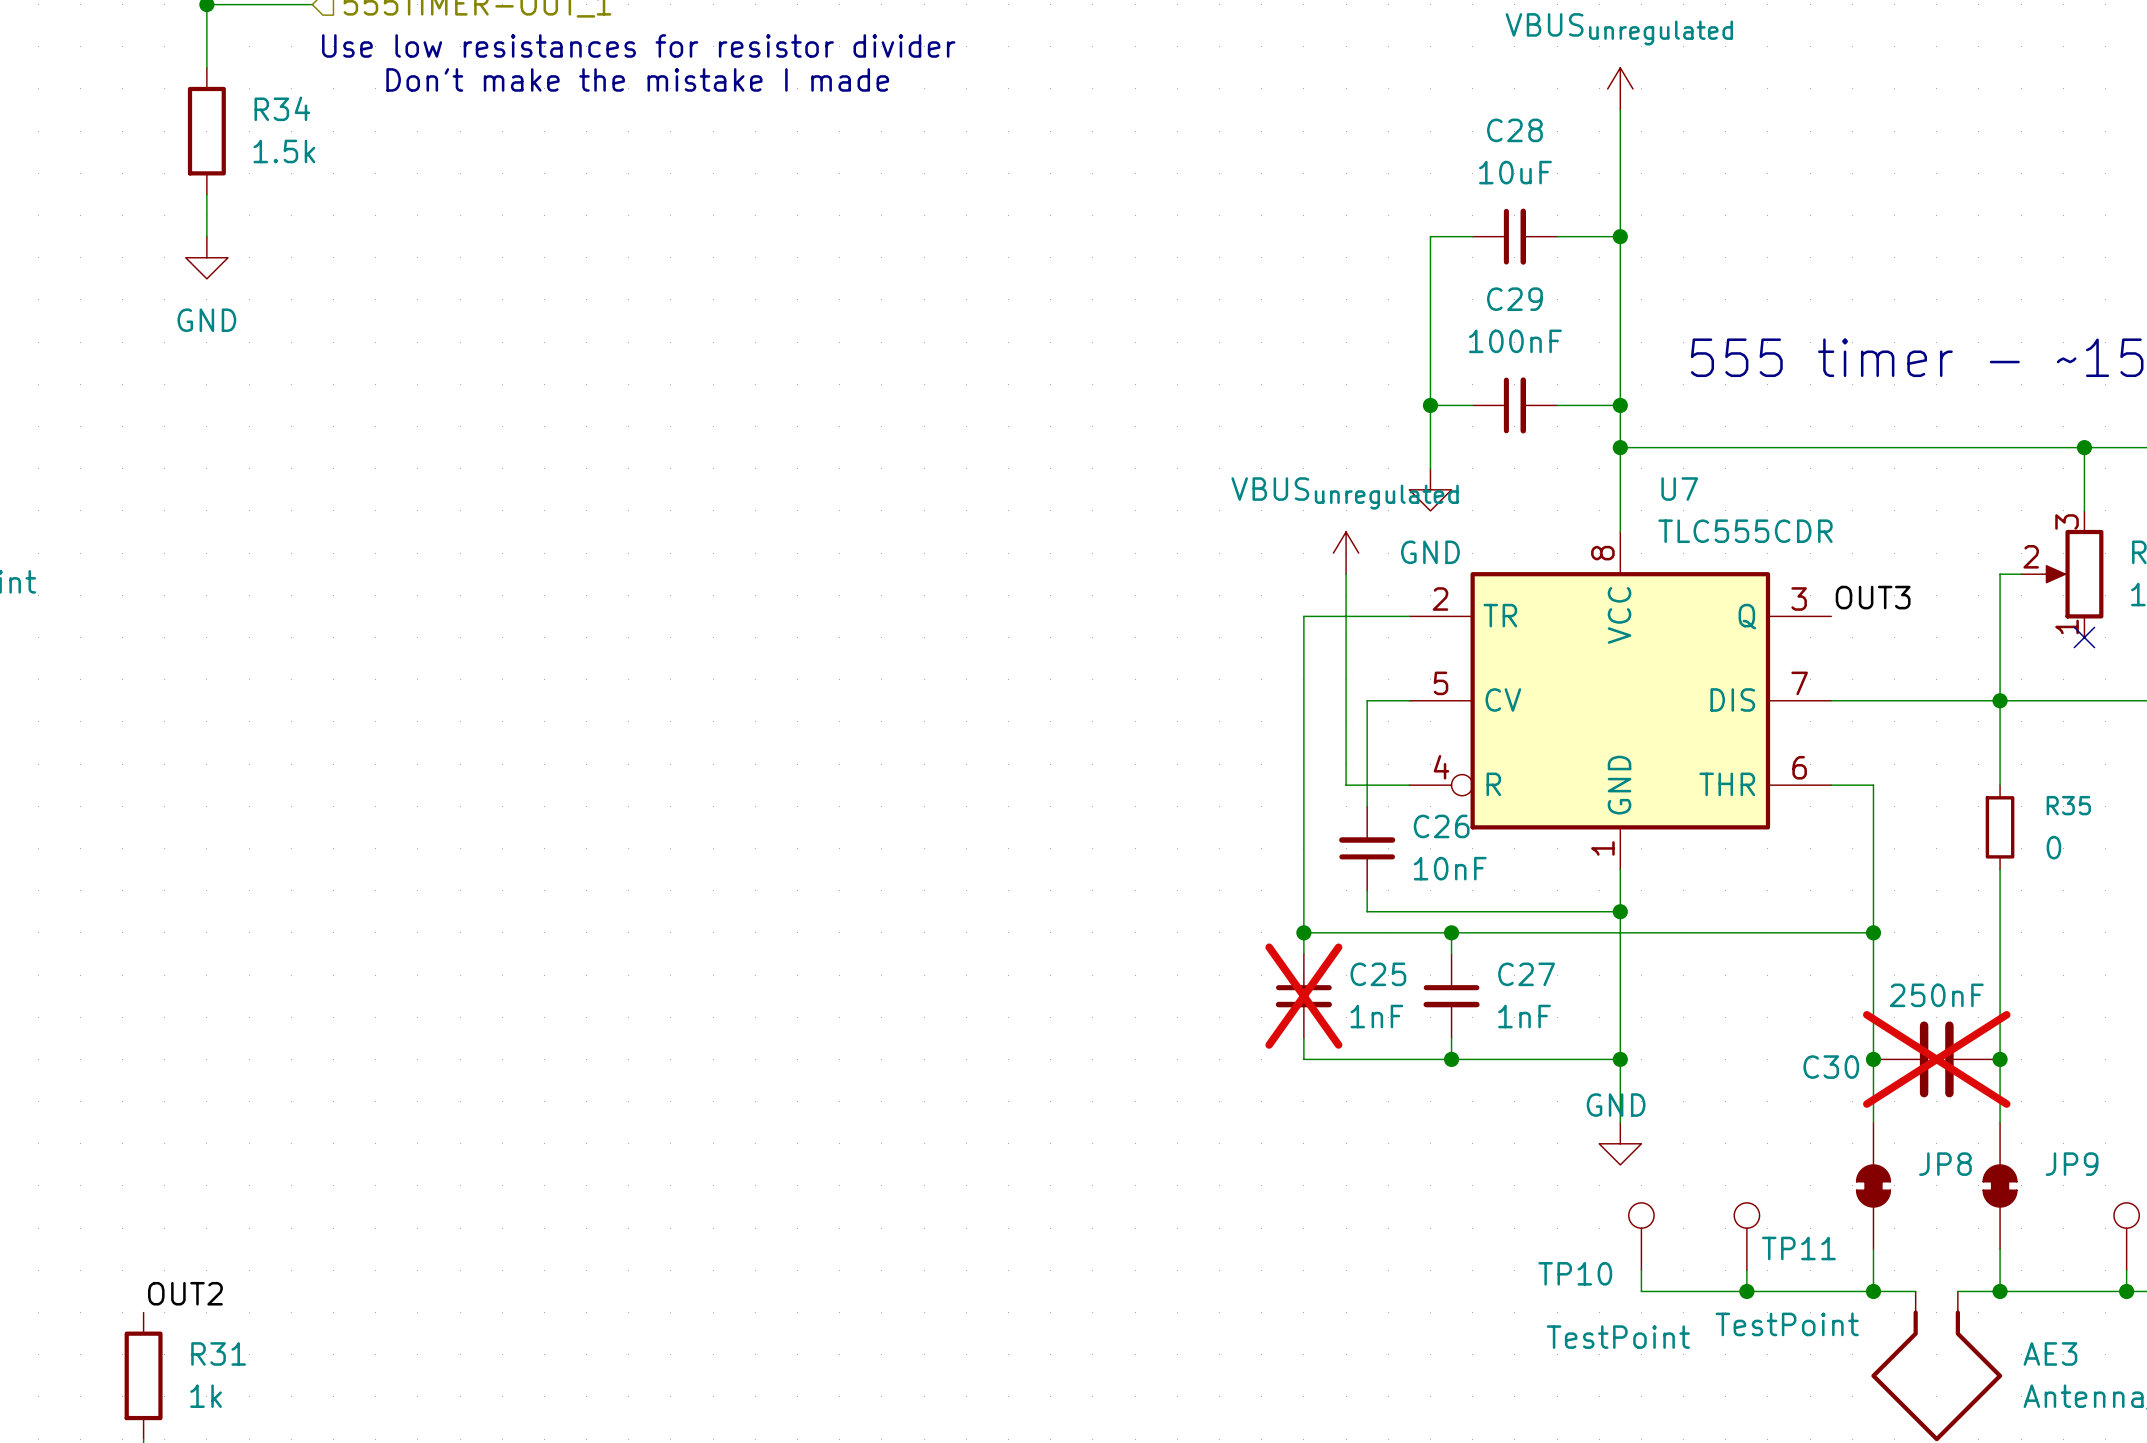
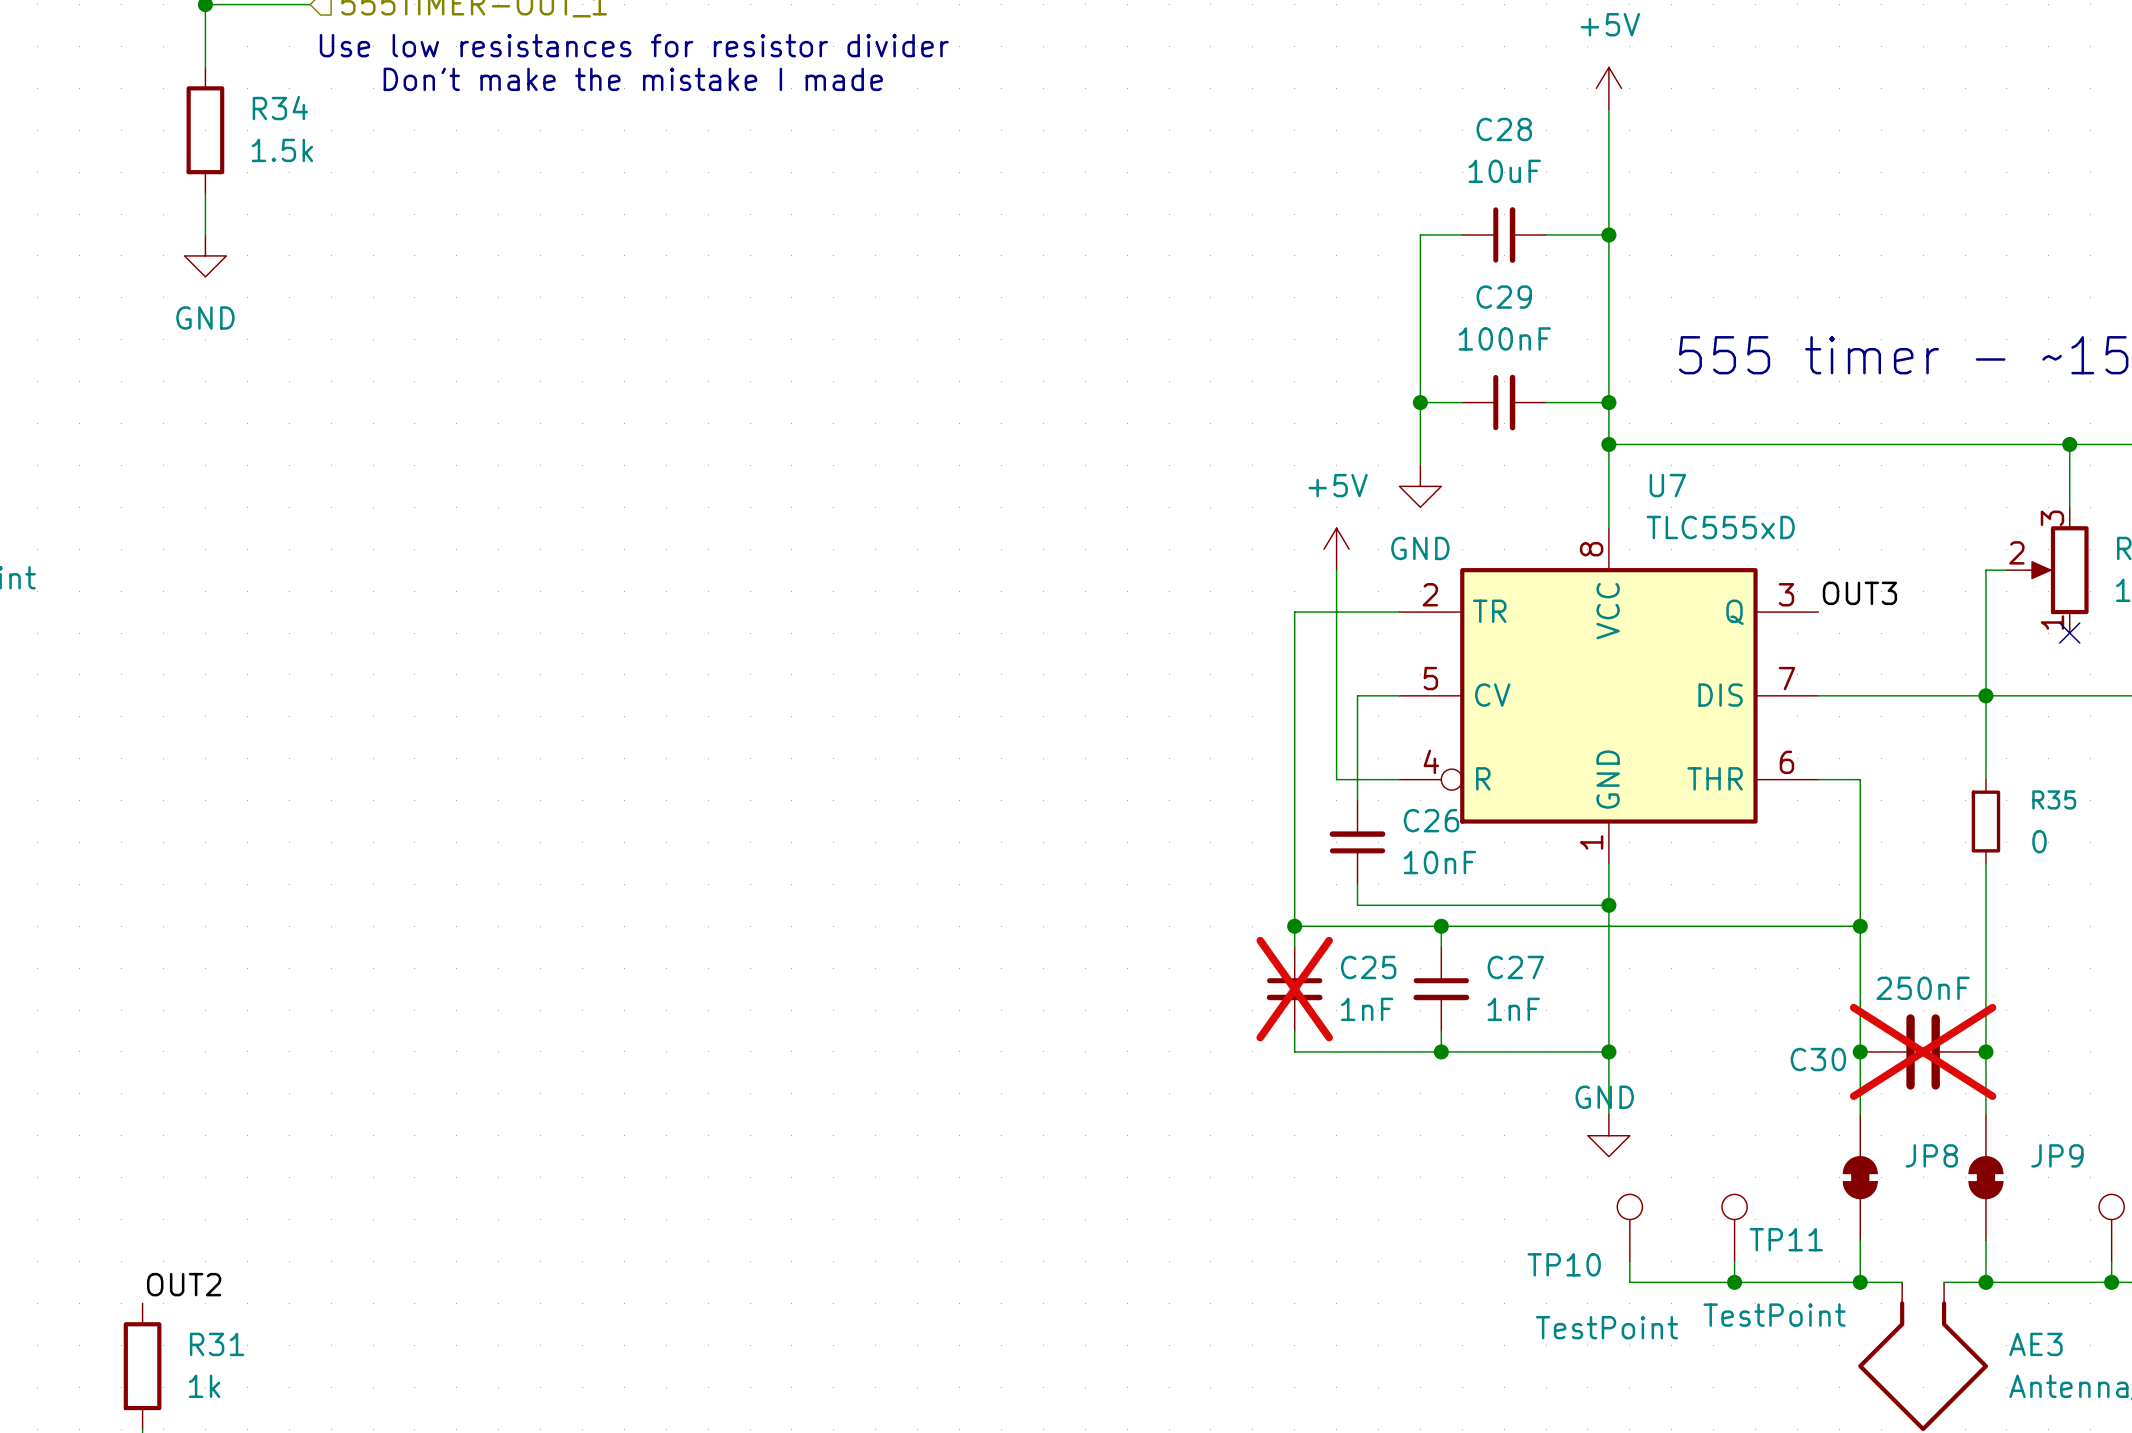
power symbol: VBUSunregulated (1620, 88) -> +5V (1608, 88)
U7 value: TLC555CDR (1745, 531) -> TLC555xD (1720, 527)
power symbol: VBUSunregulated (1346, 553) -> +5V (1336, 549)

